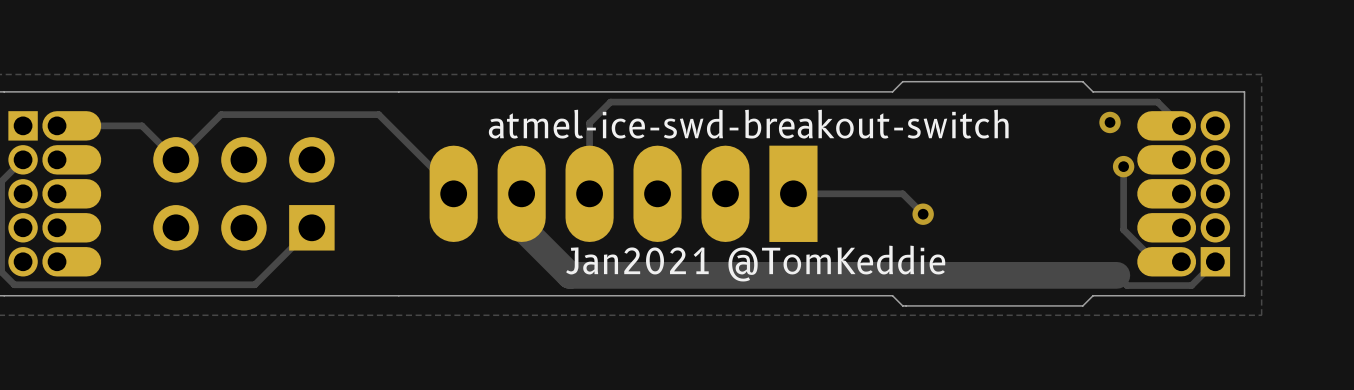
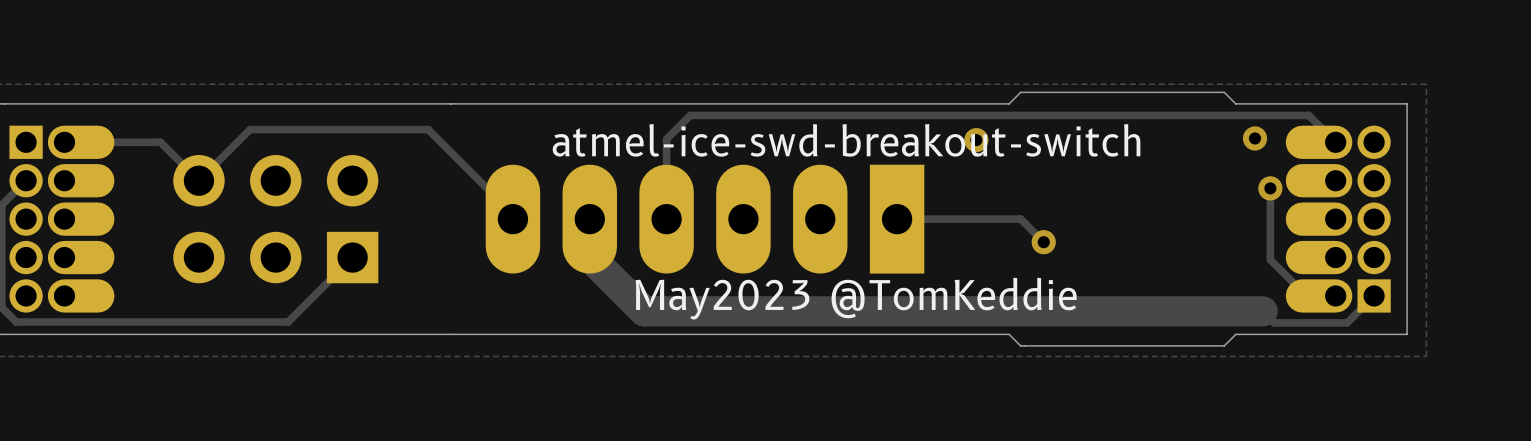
via: none -> (976, 140)
text: Jan2021 @TomKeddie (755, 263) -> May2023 @TomKeddie (856, 298)

